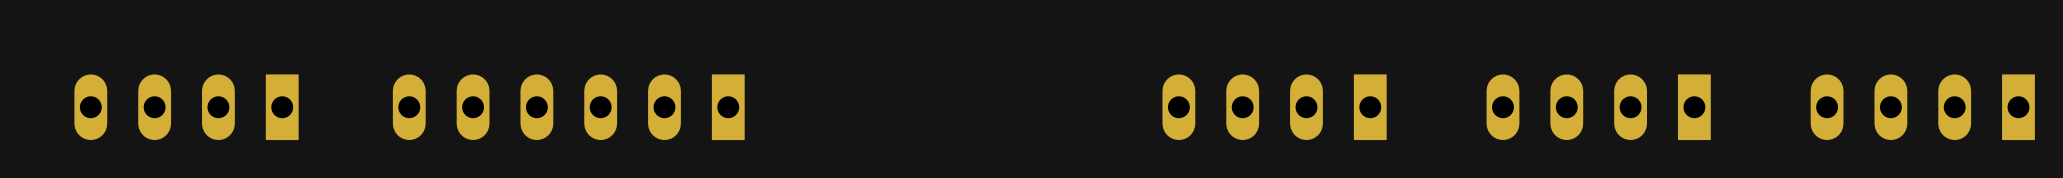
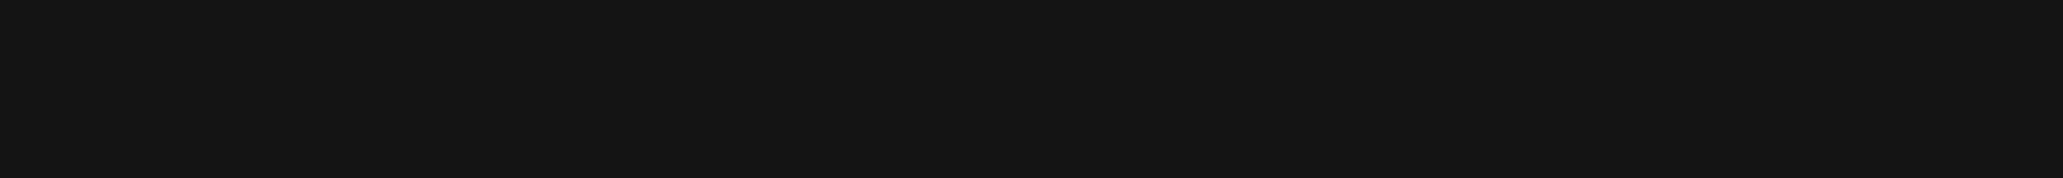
part: (186, 107) -> none
part: (568, 107) -> none
part: (1274, 107) -> none
part: (1598, 107) -> none
part: (1922, 107) -> none

